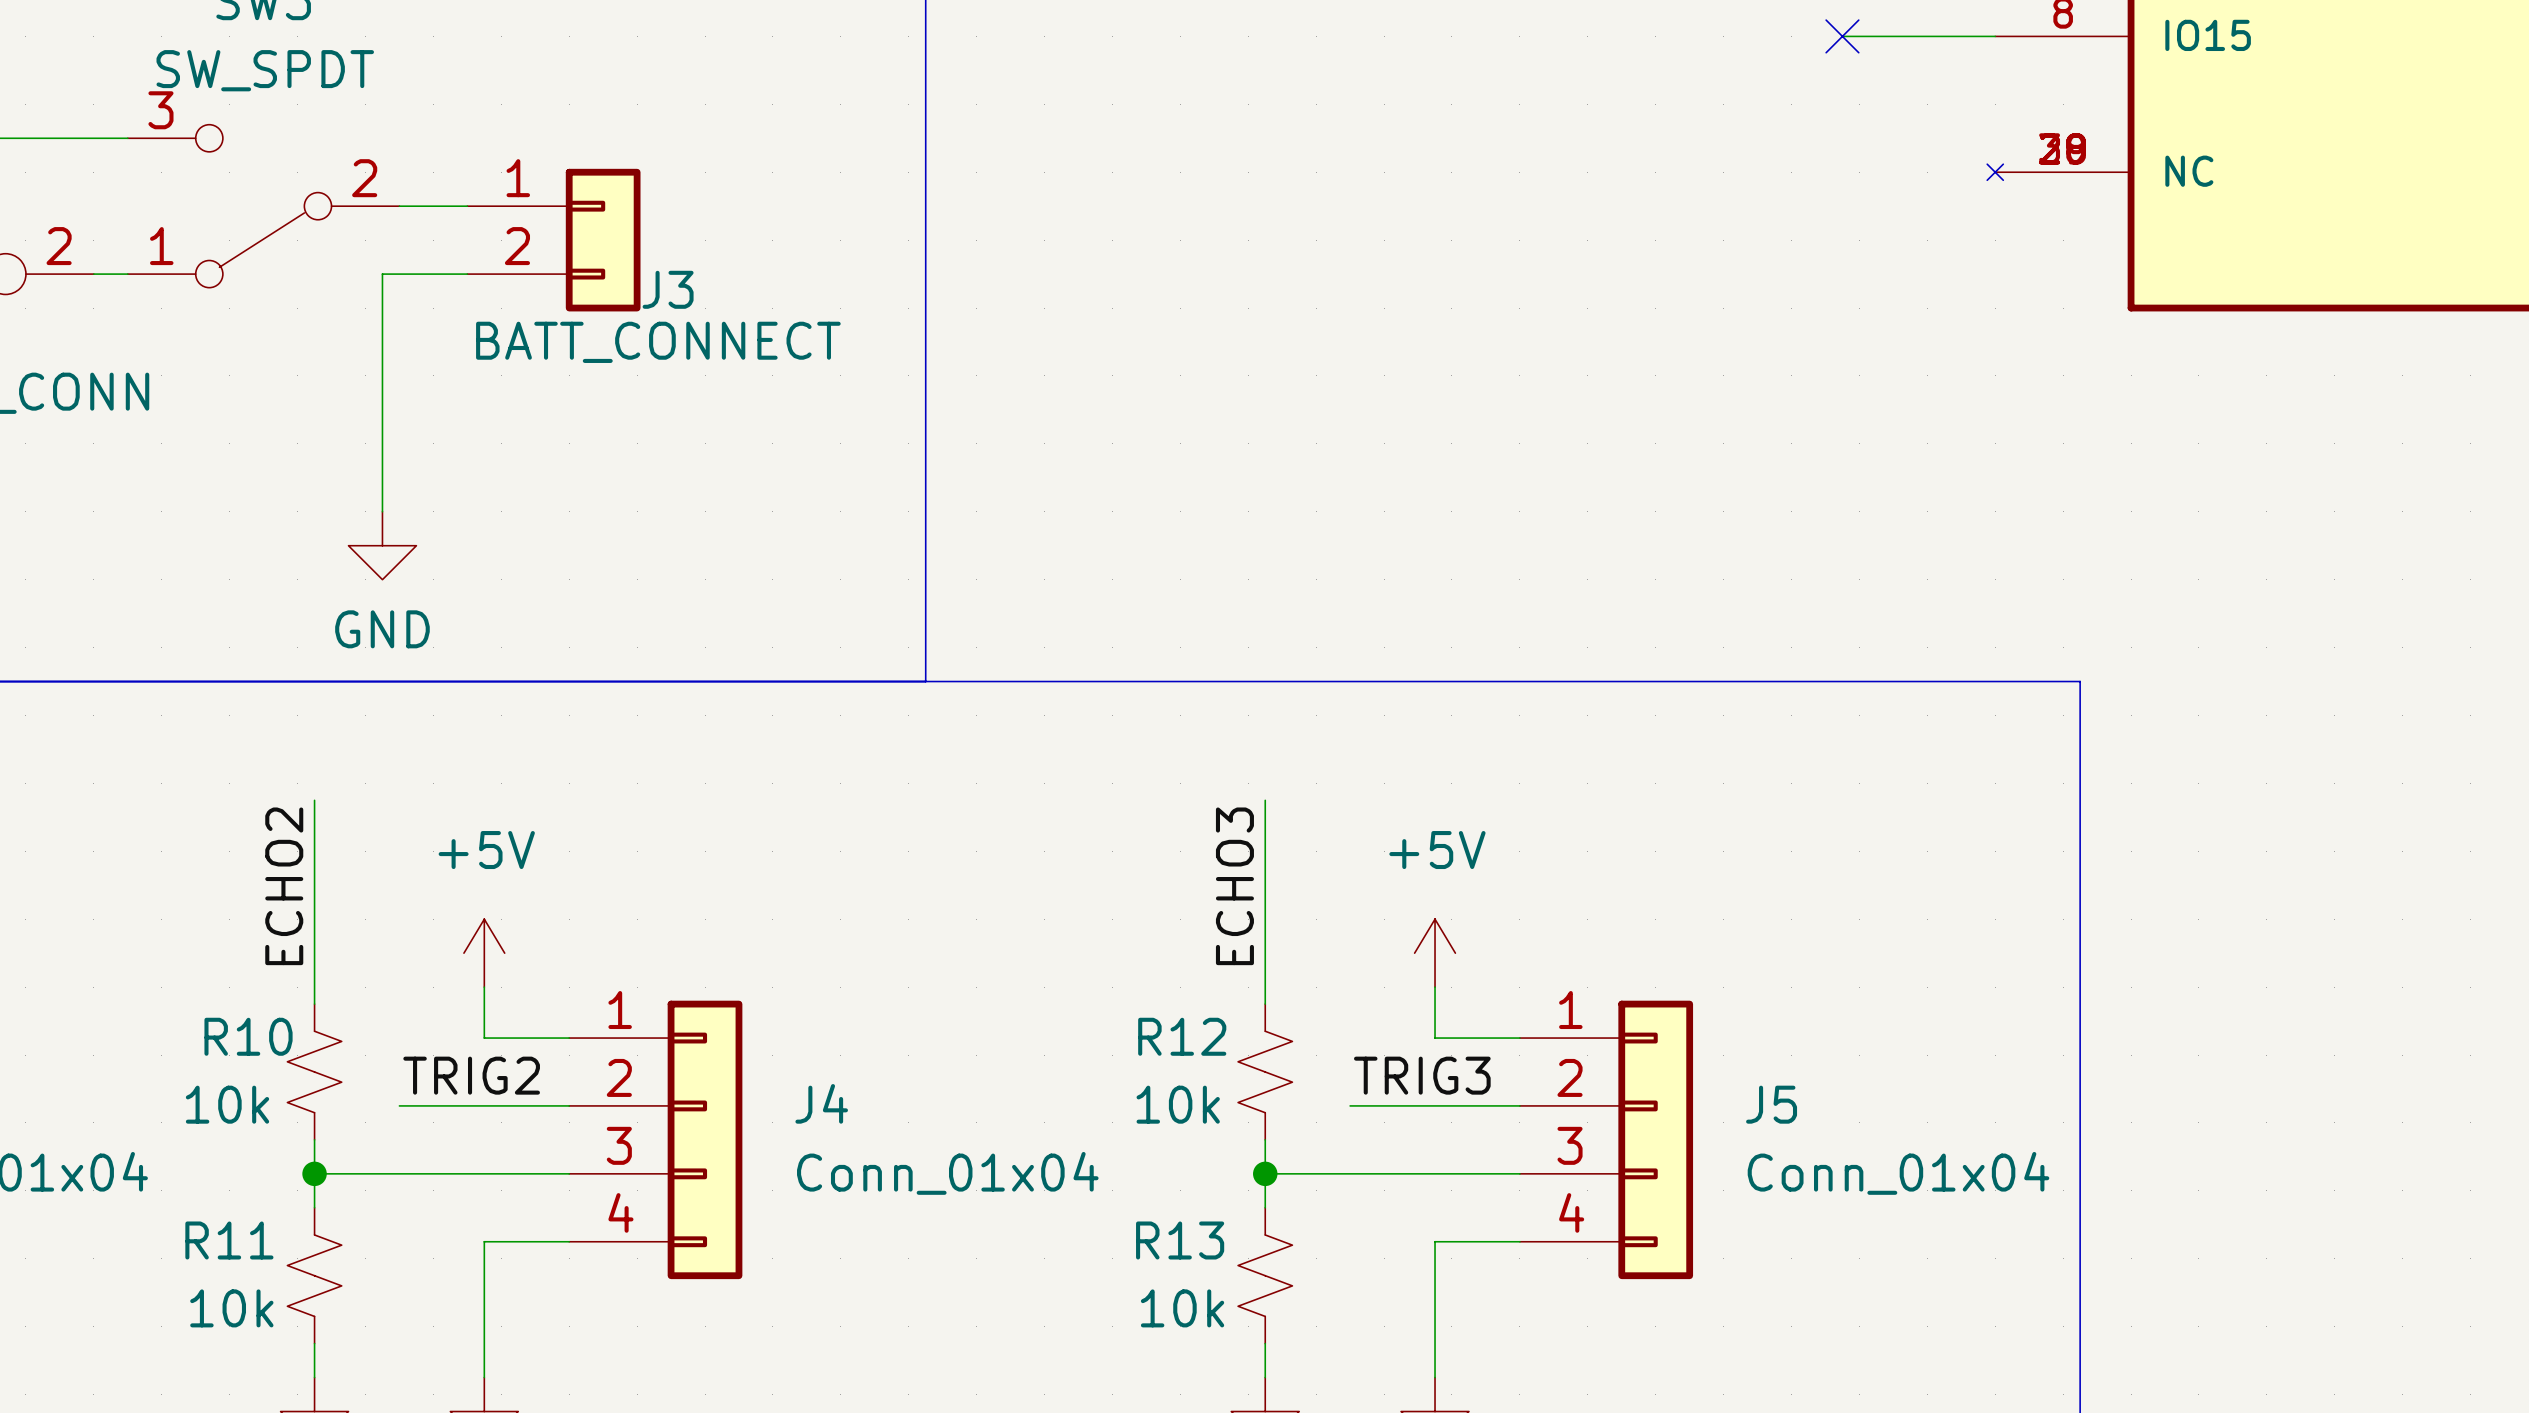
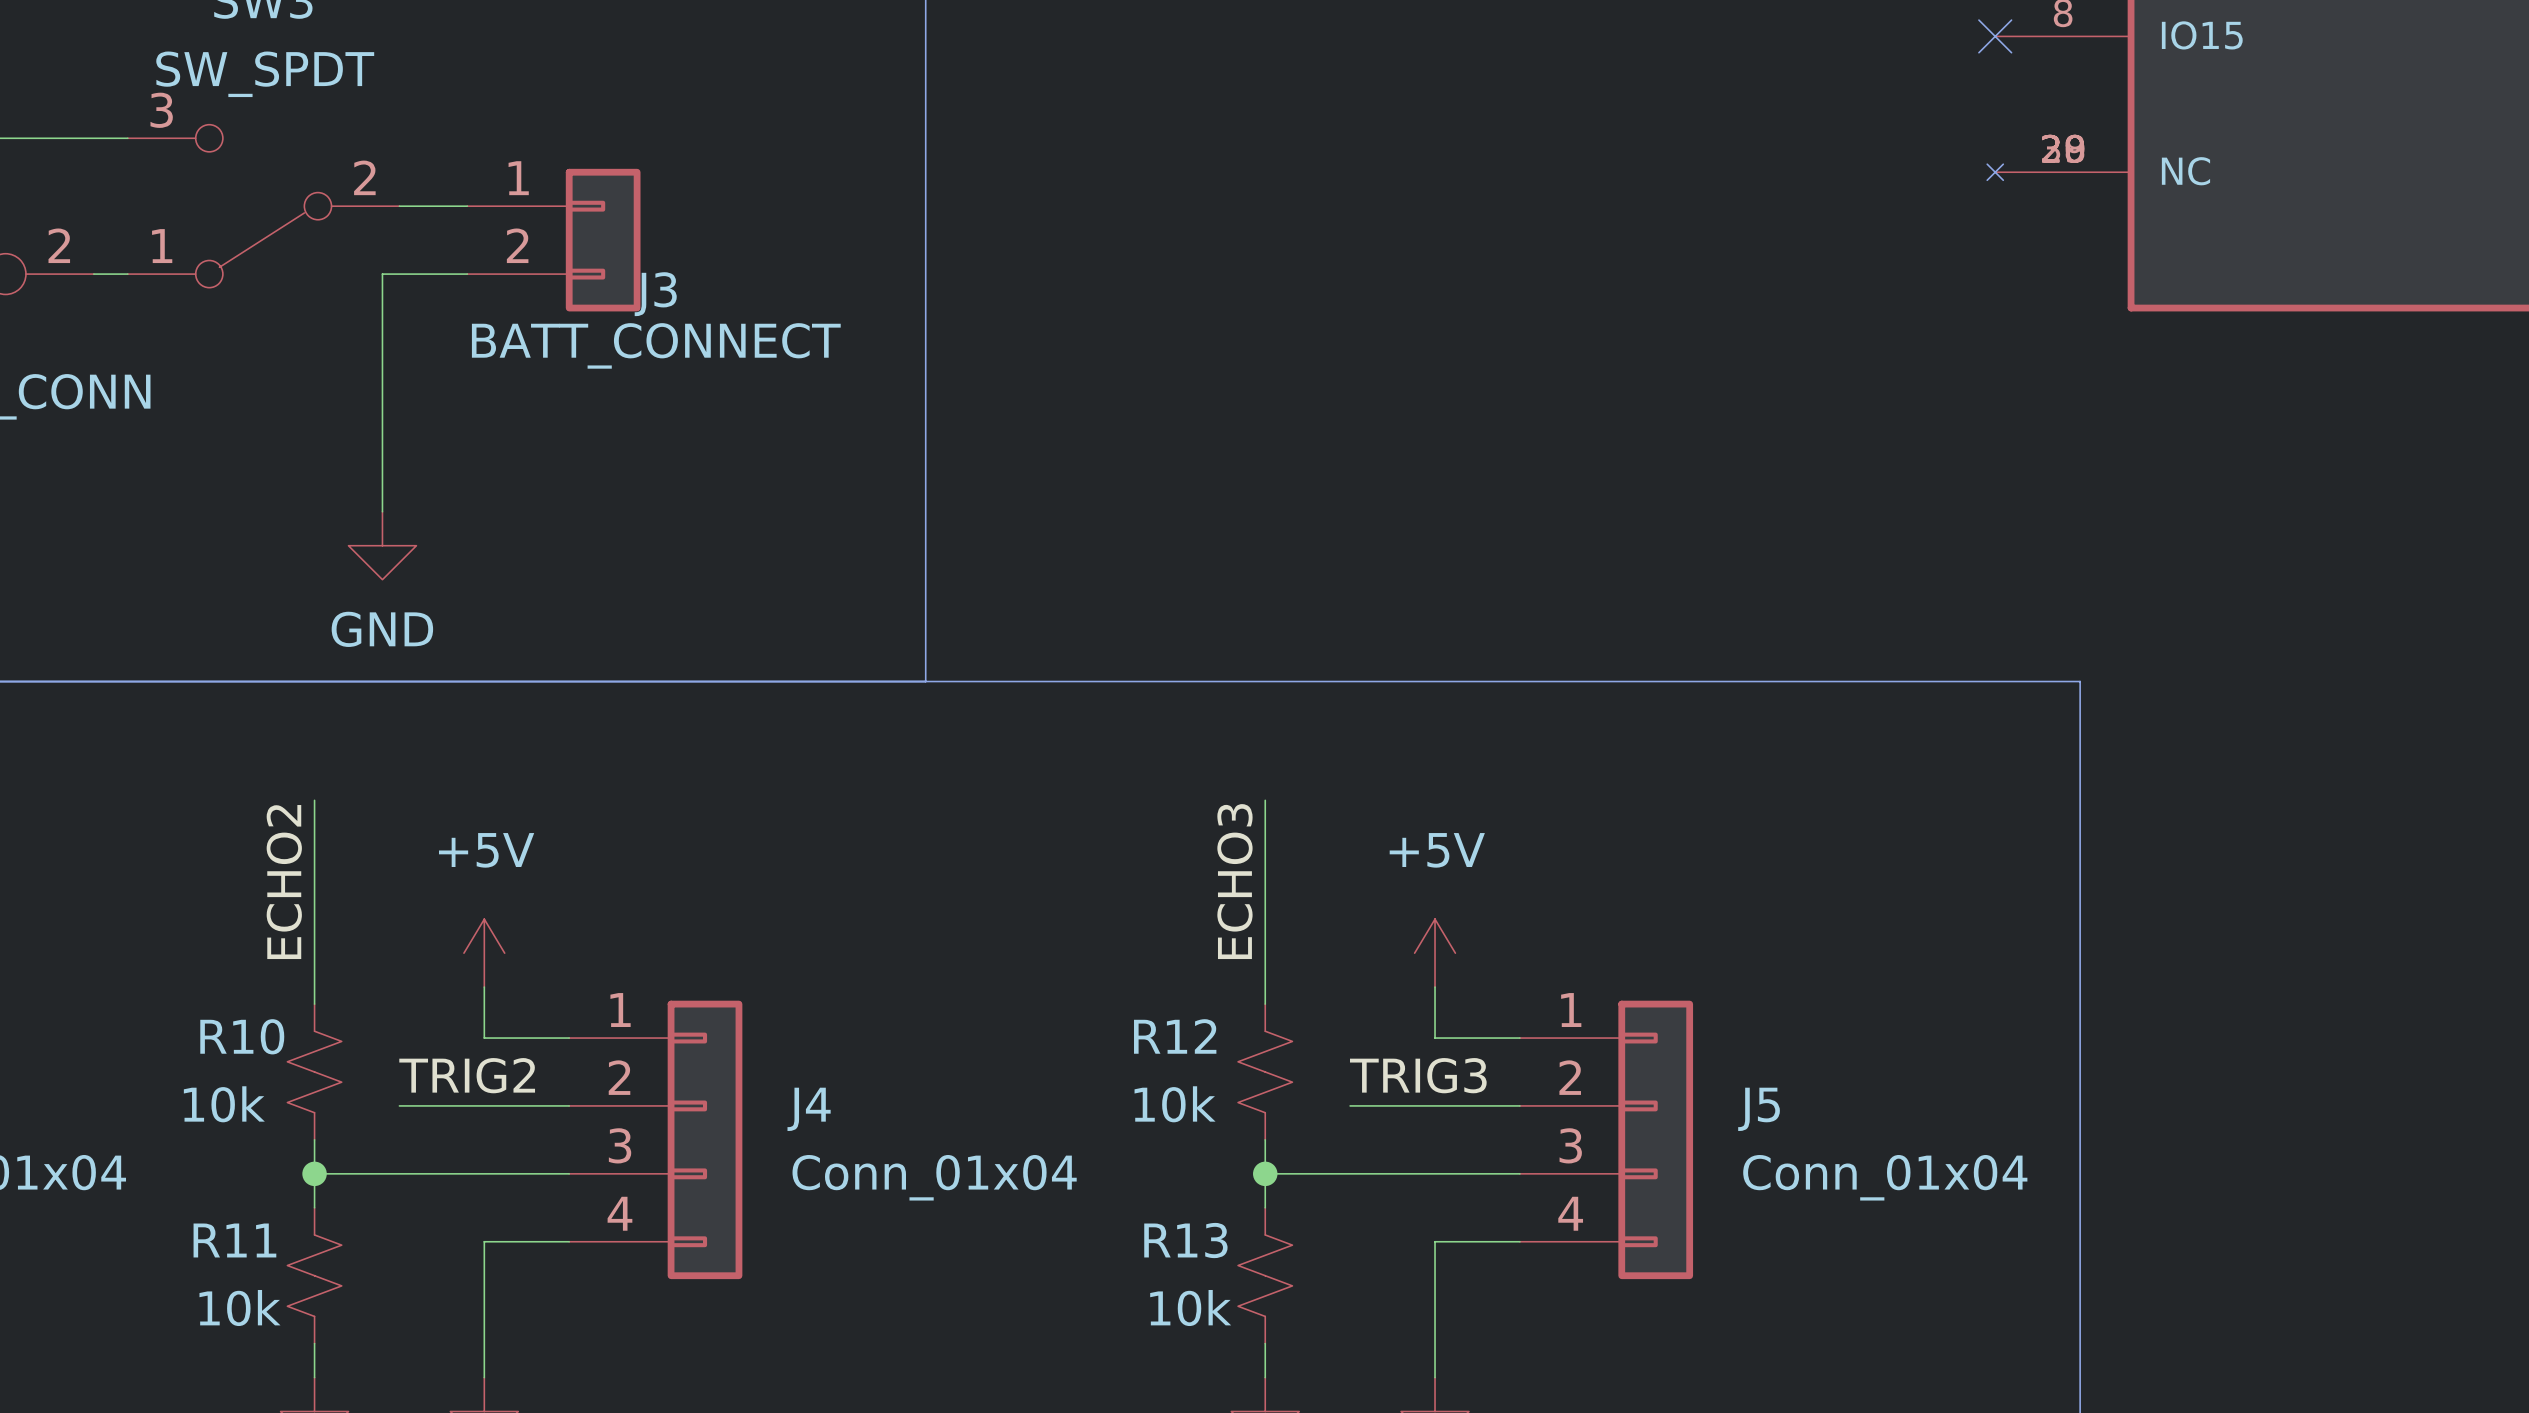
wire: (1842, 36) (1995, 36) -> none
no-connect mark: (1842, 36) -> none
no-connect mark: none -> (1995, 36)

